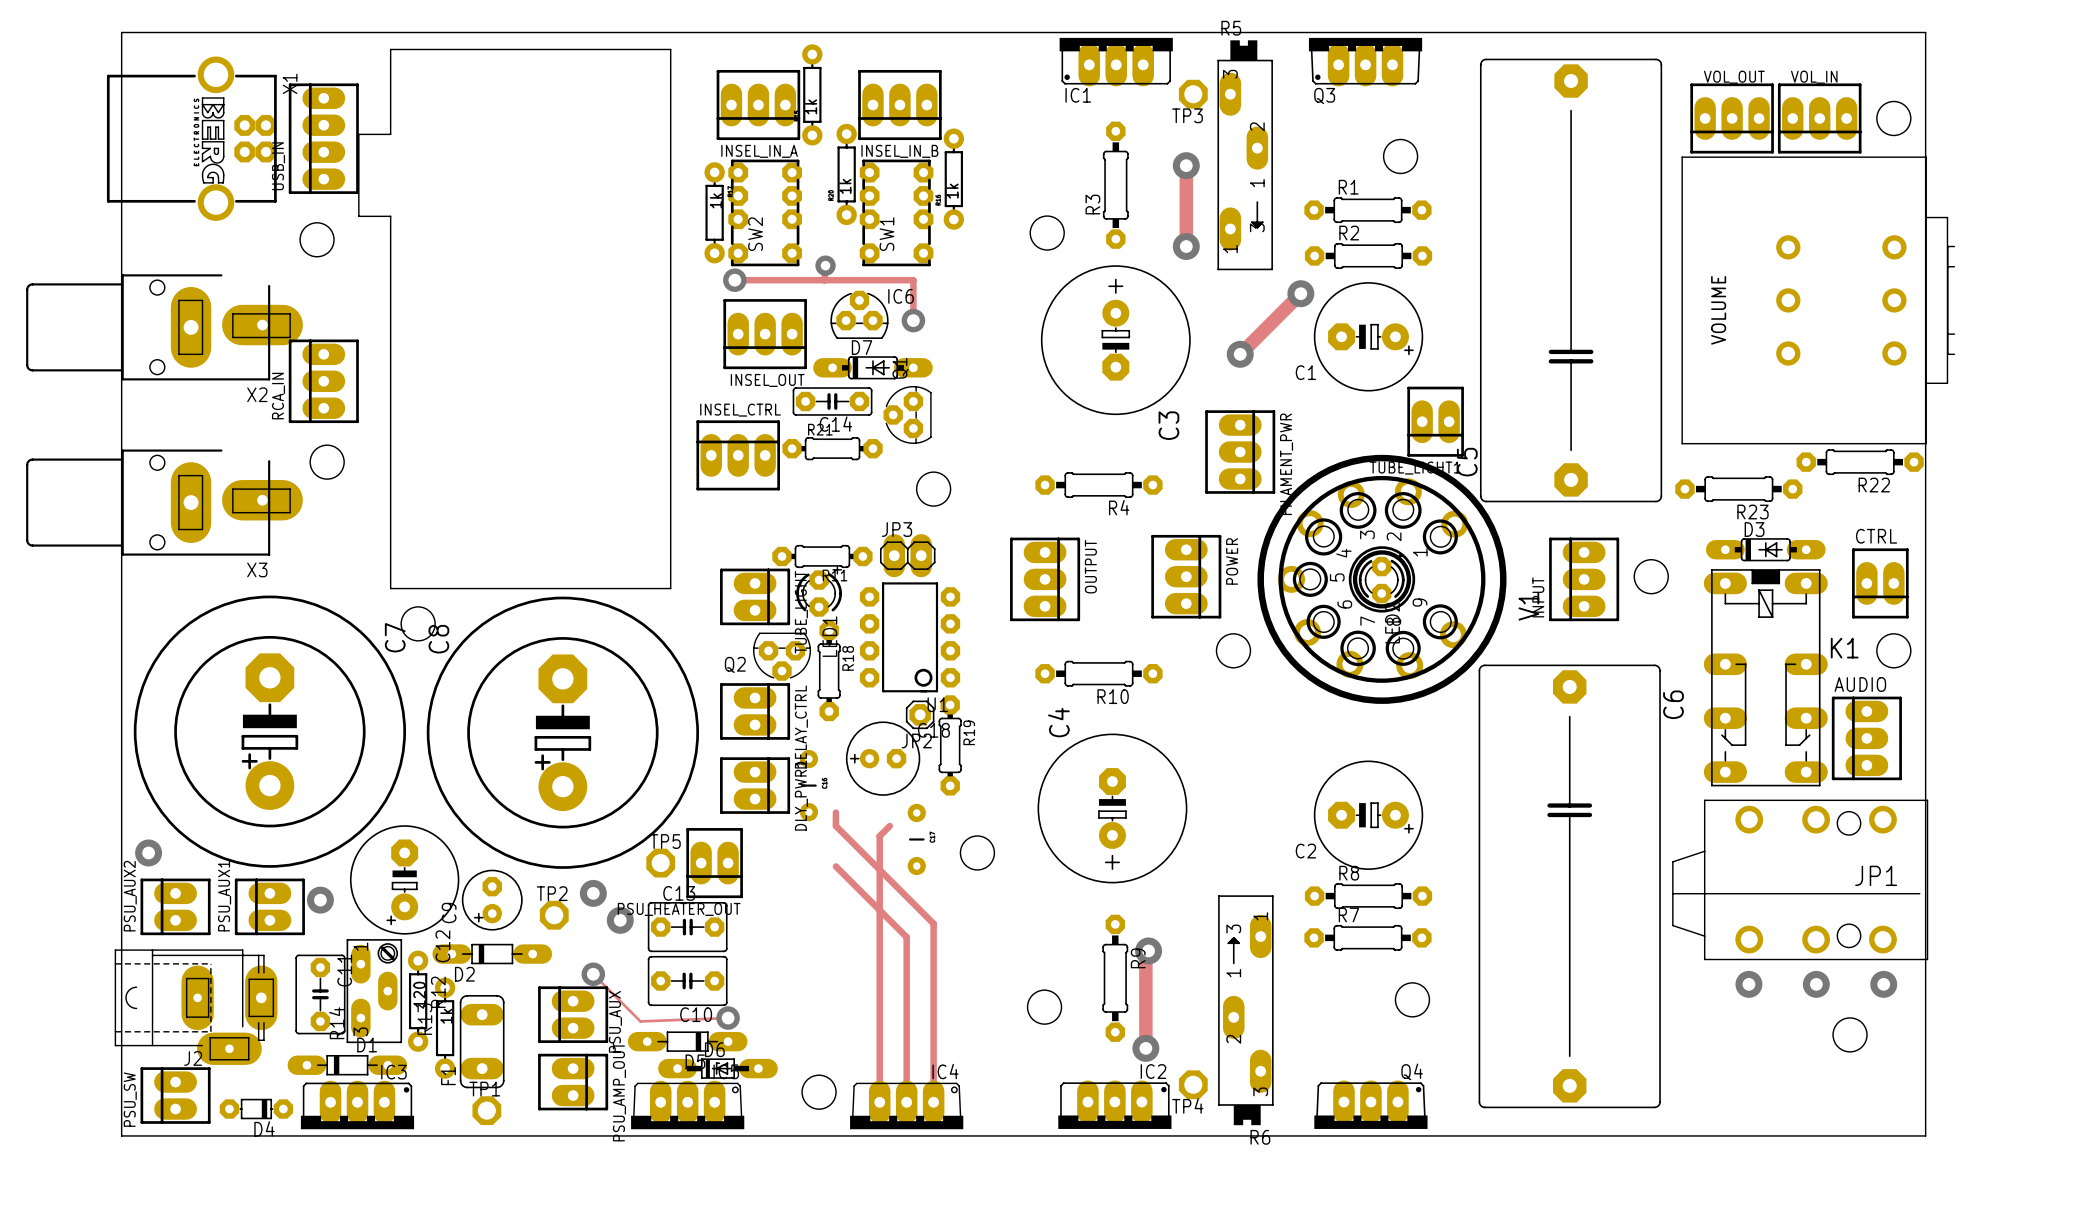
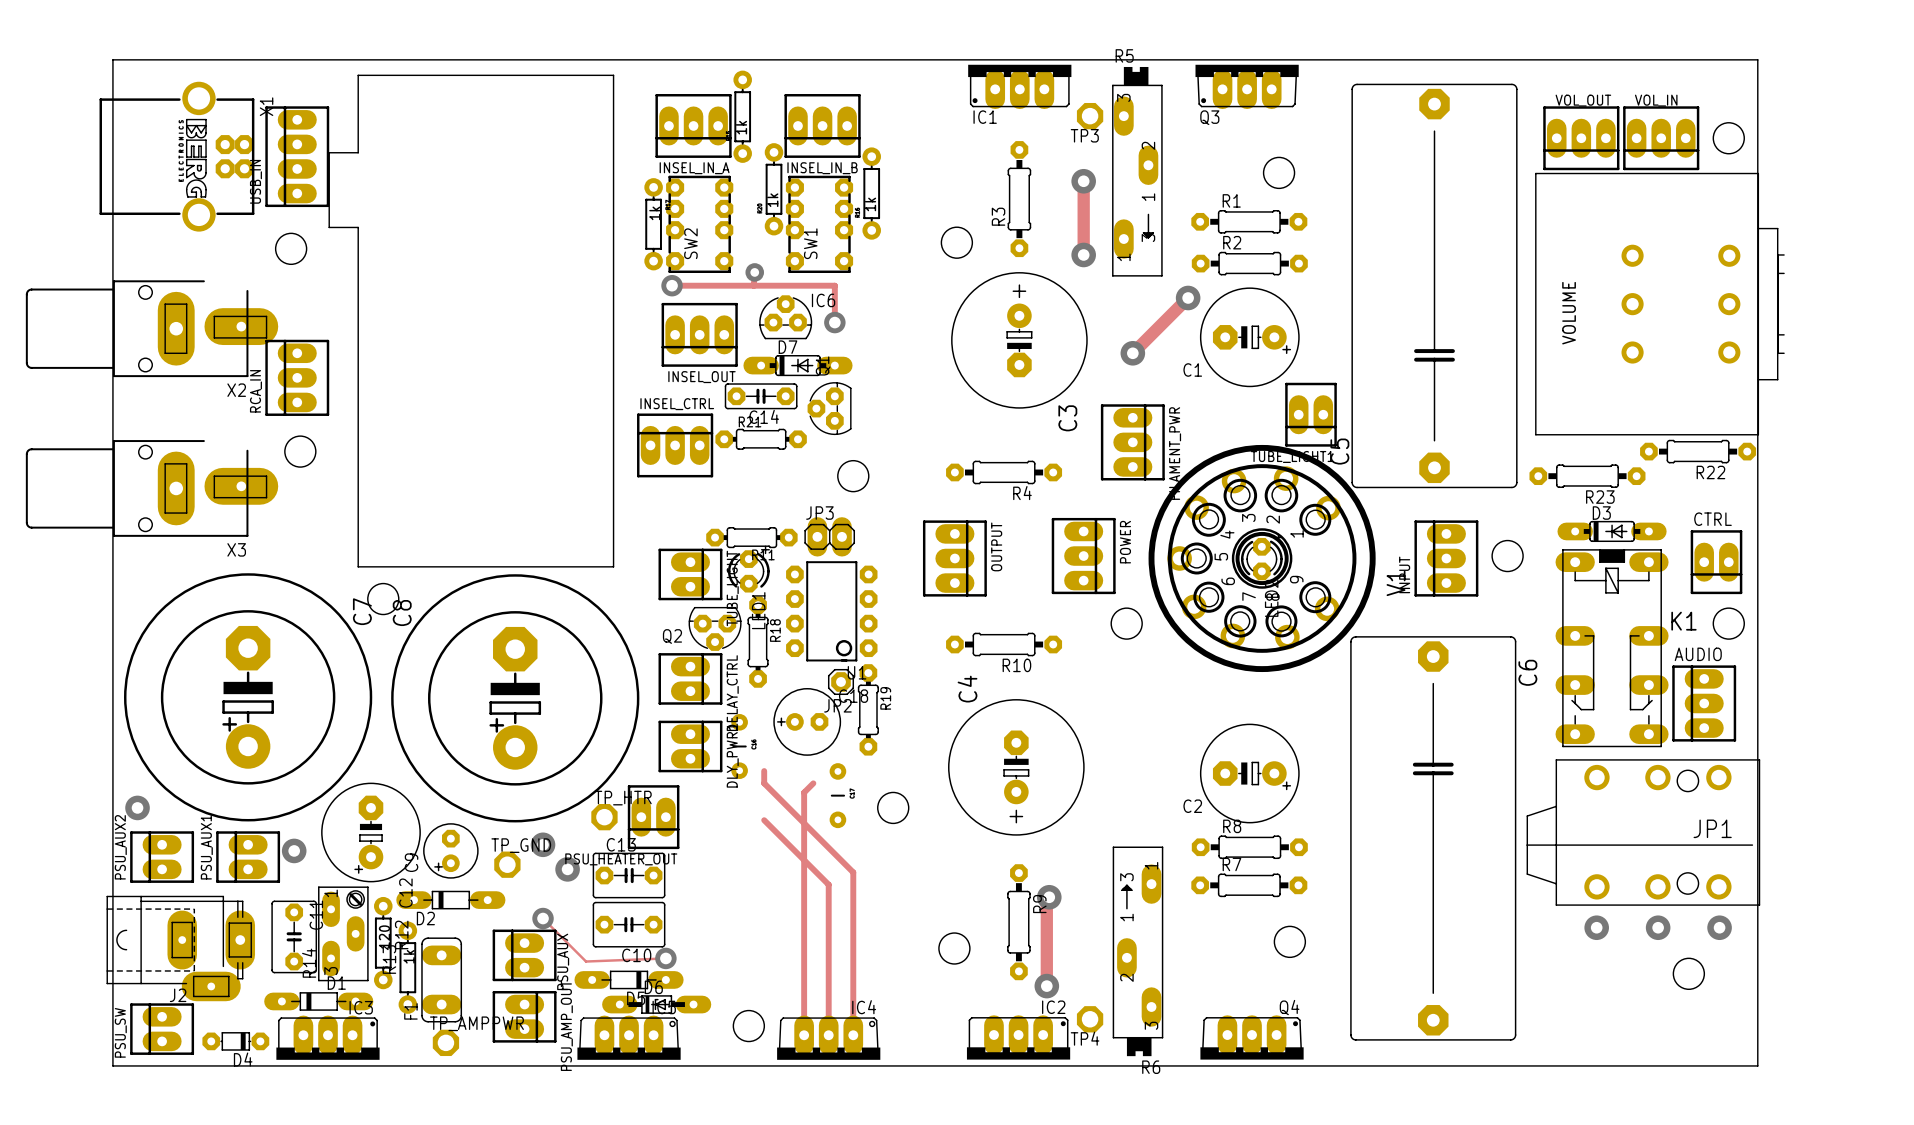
TP5 name: TP5 (665, 841) -> TP_HTR (623, 798)
TP2 name: TP2 (552, 893) -> TP_GND (521, 845)
TP1 name: TP1 (484, 1089) -> TP_AMPPWR (476, 1023)

